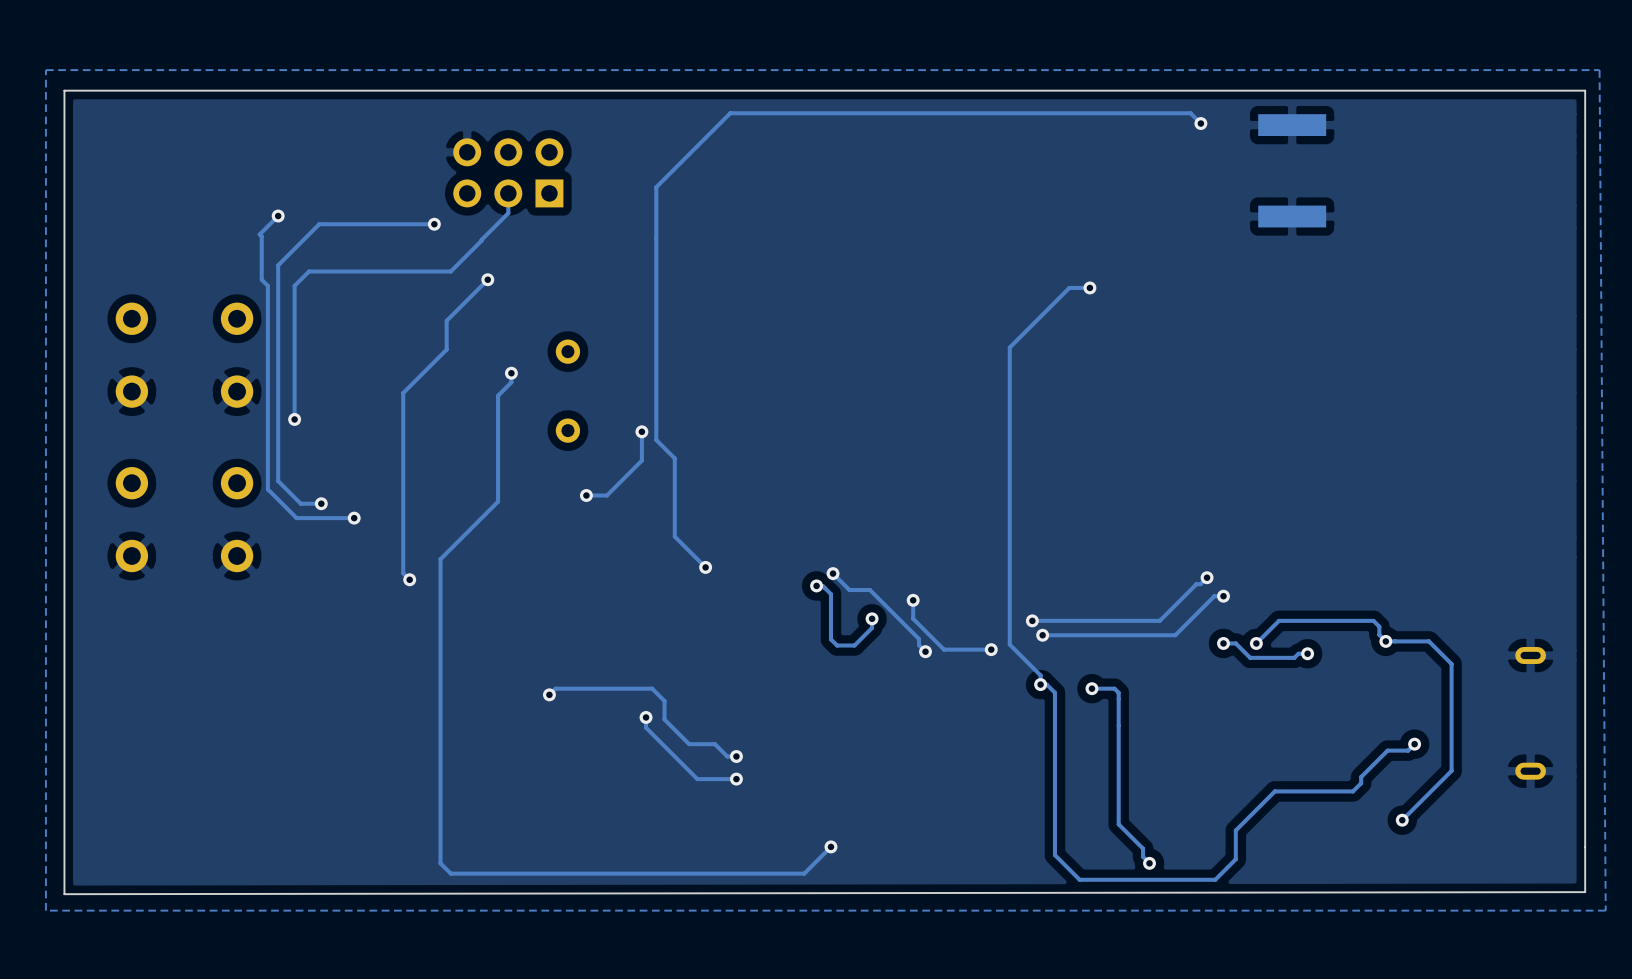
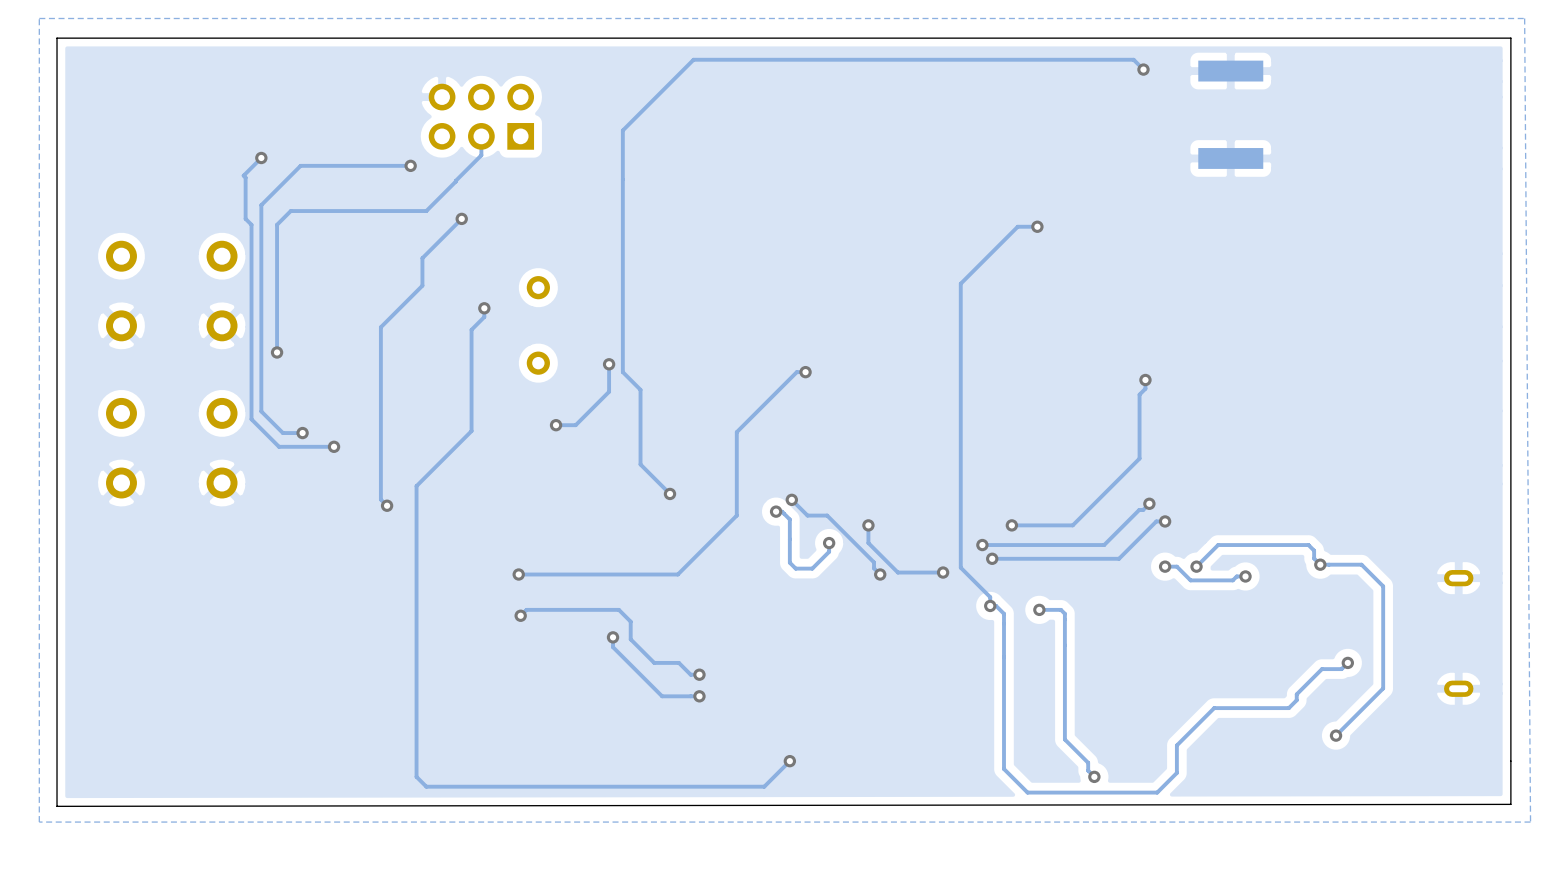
track: none -> (805, 372) (796, 372) (736, 432) (736, 515) (677, 574) (518, 574)
via: none -> (805, 372)
track: none -> (1145, 380) (1145, 388) (1139, 394) (1139, 458) (1072, 525) (1011, 525)
via: none -> (1145, 380)
via: none -> (1011, 525)
via: none -> (518, 574)

